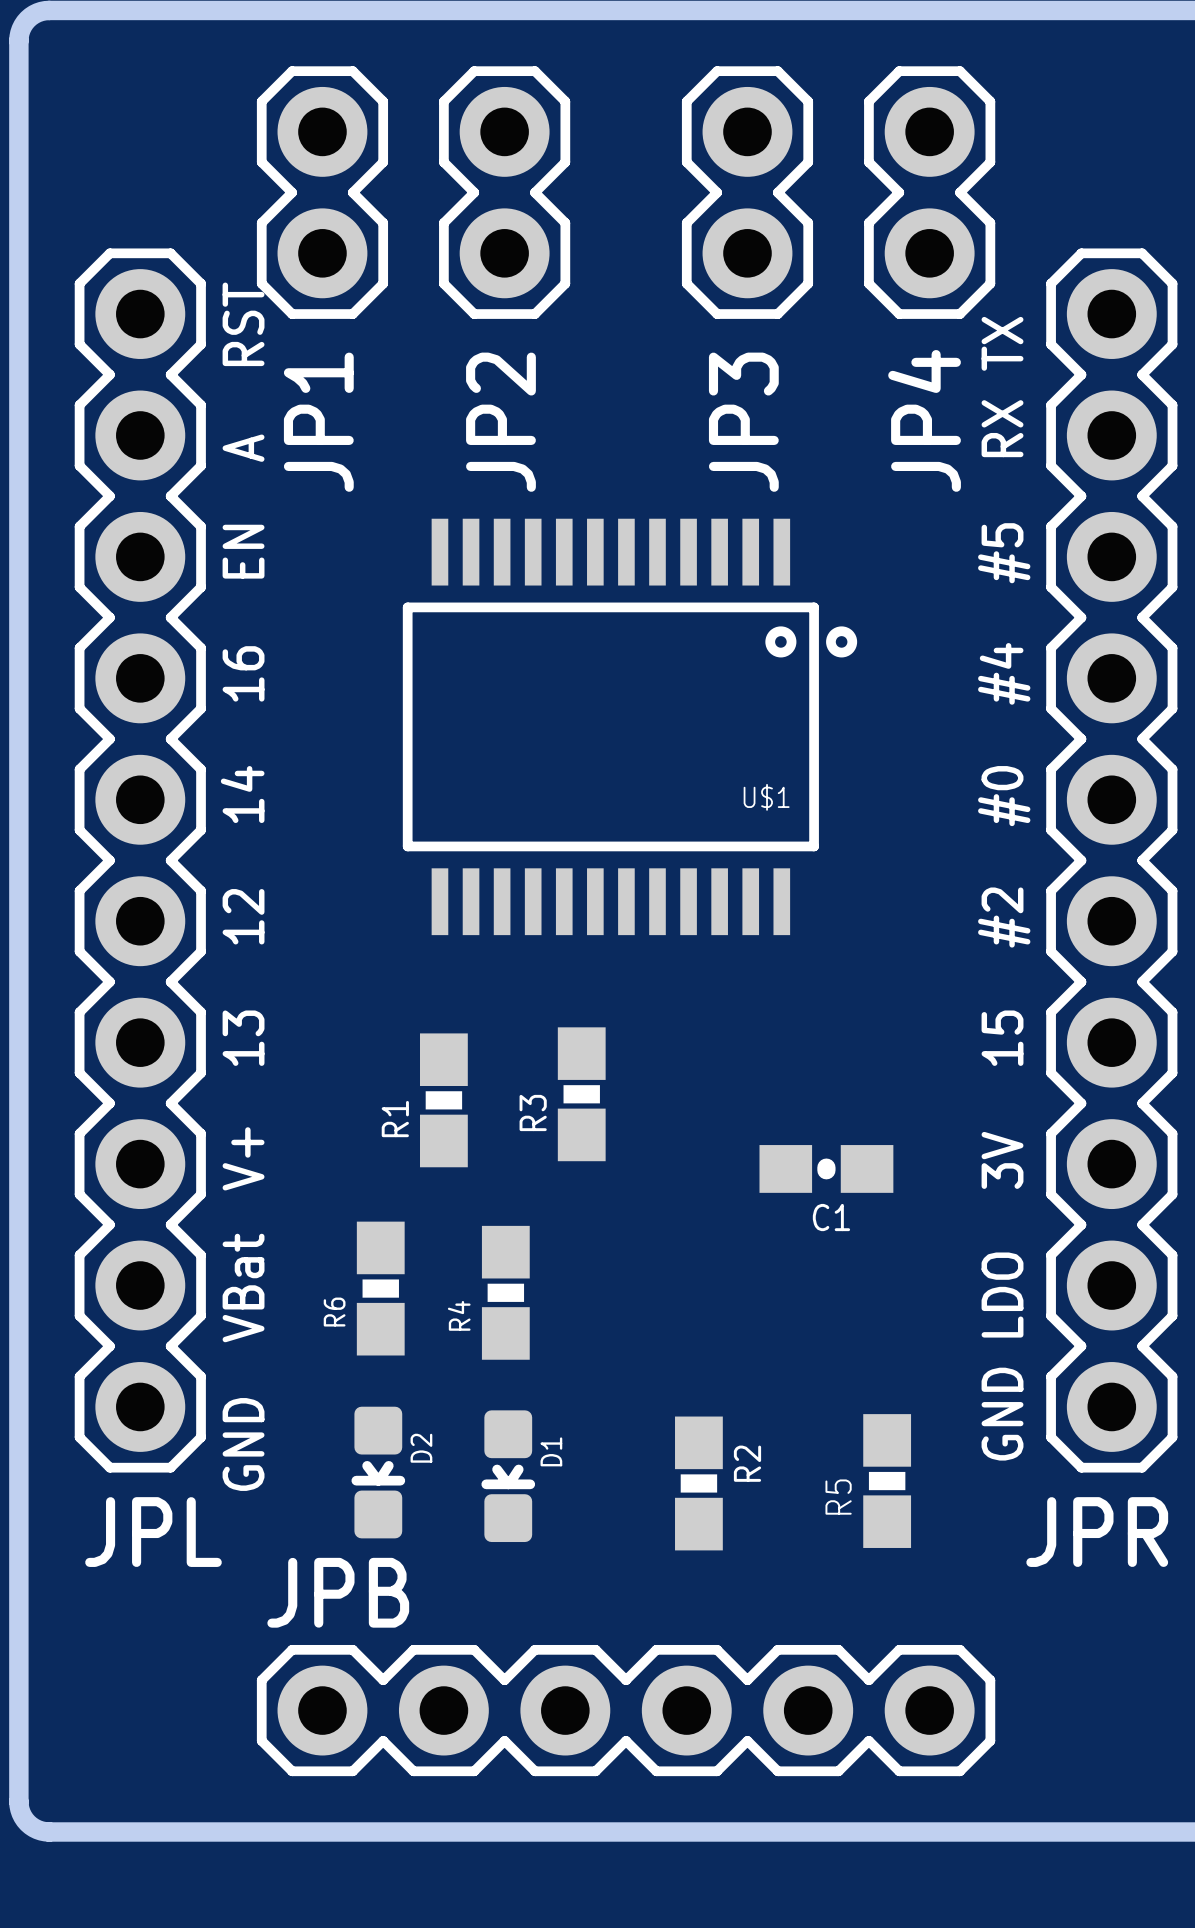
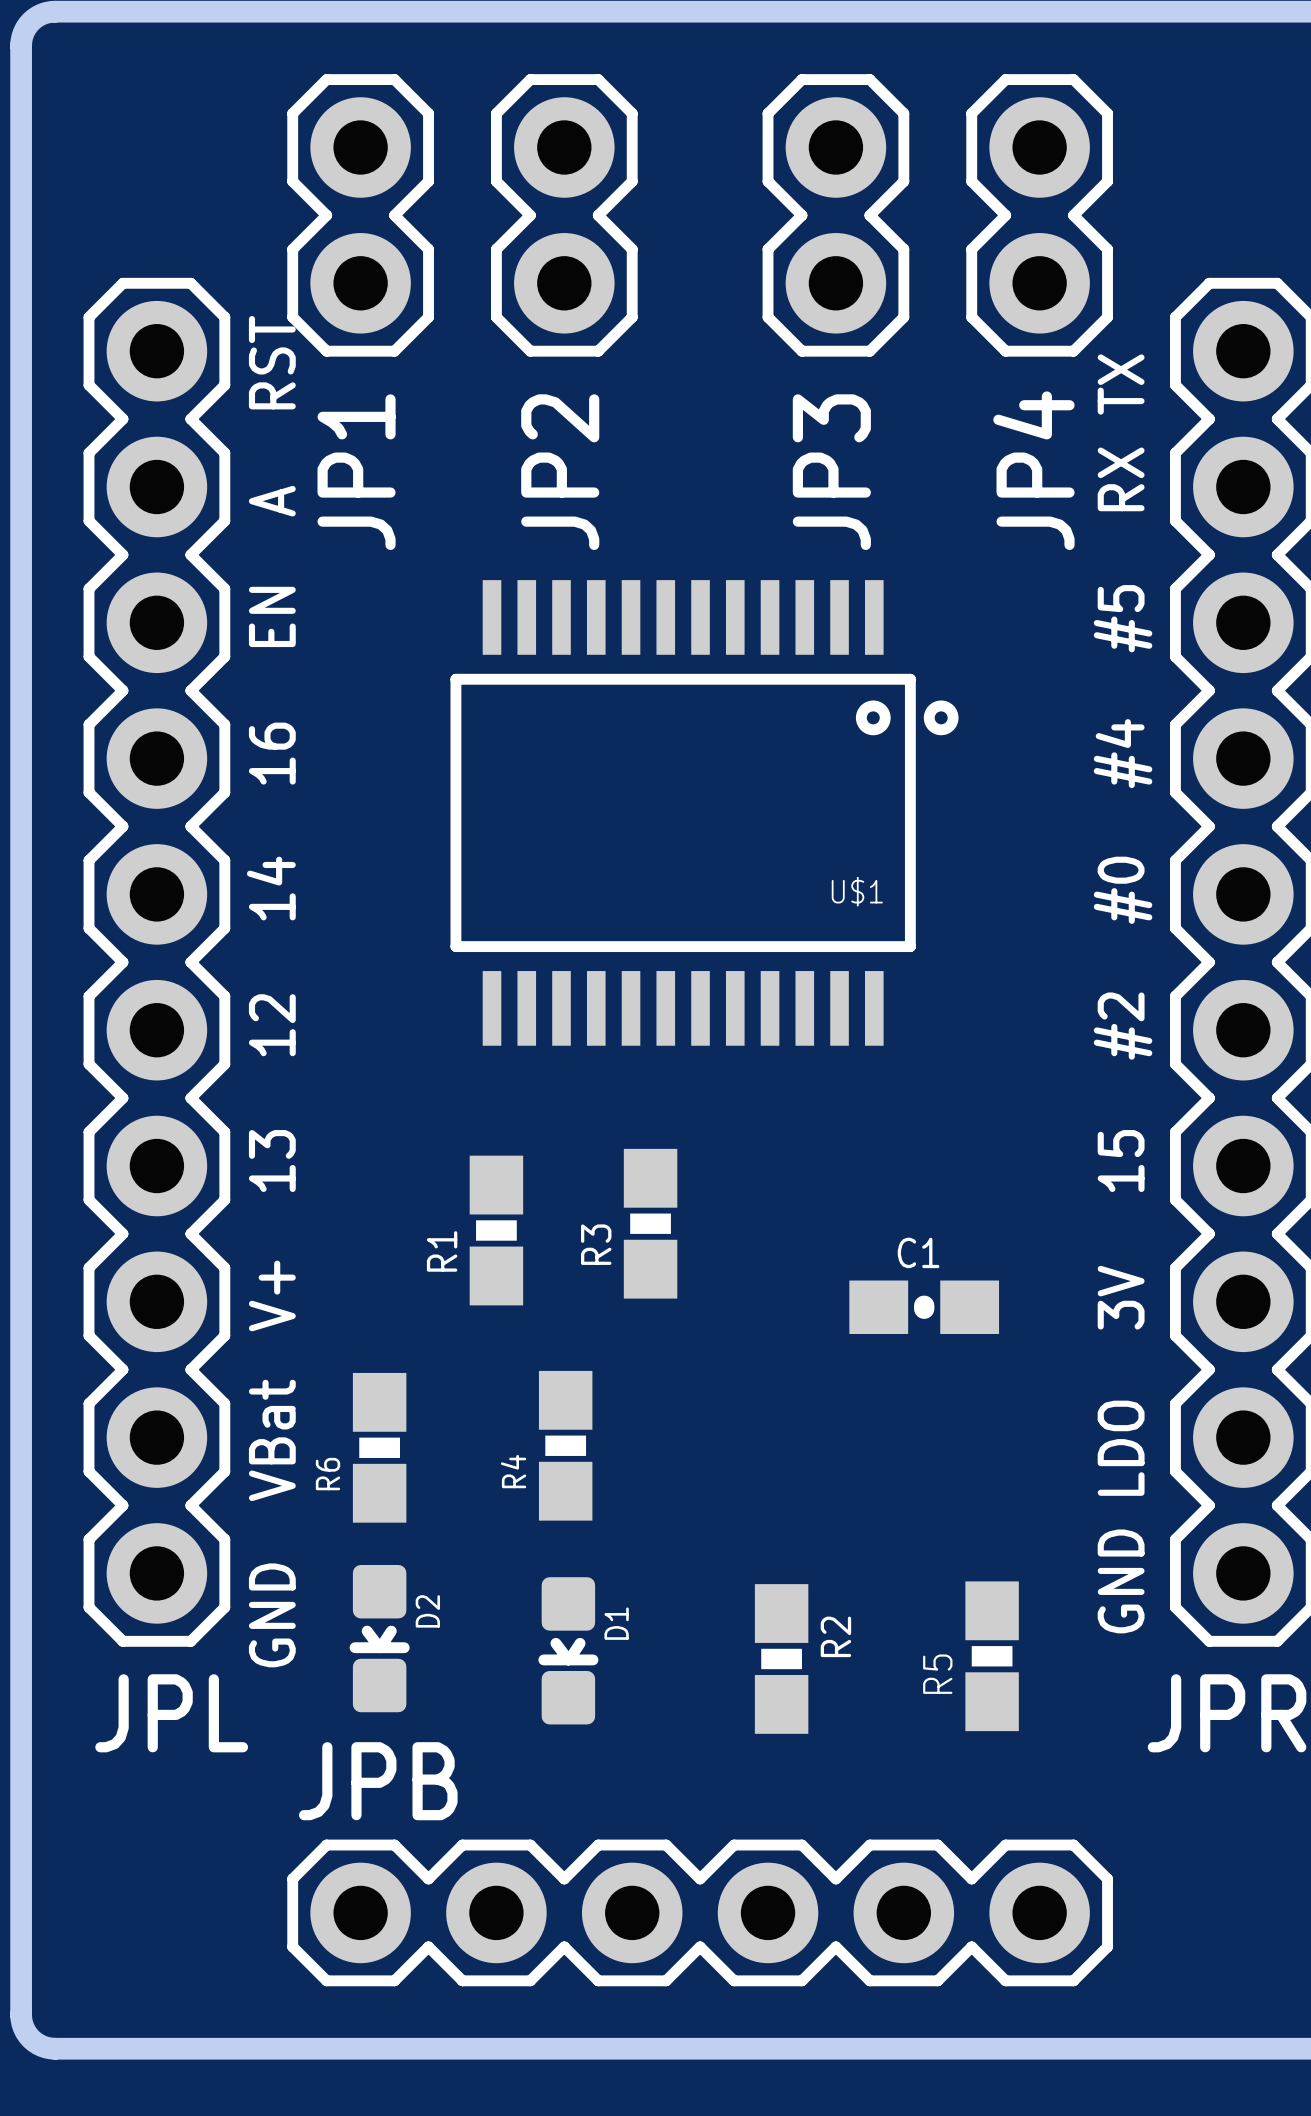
C1 name position: C1 (831, 1217) -> C1 (918, 1252)
R6 position: (380, 1288) -> (379, 1447)
D2 position: (378, 1472) -> (379, 1638)

